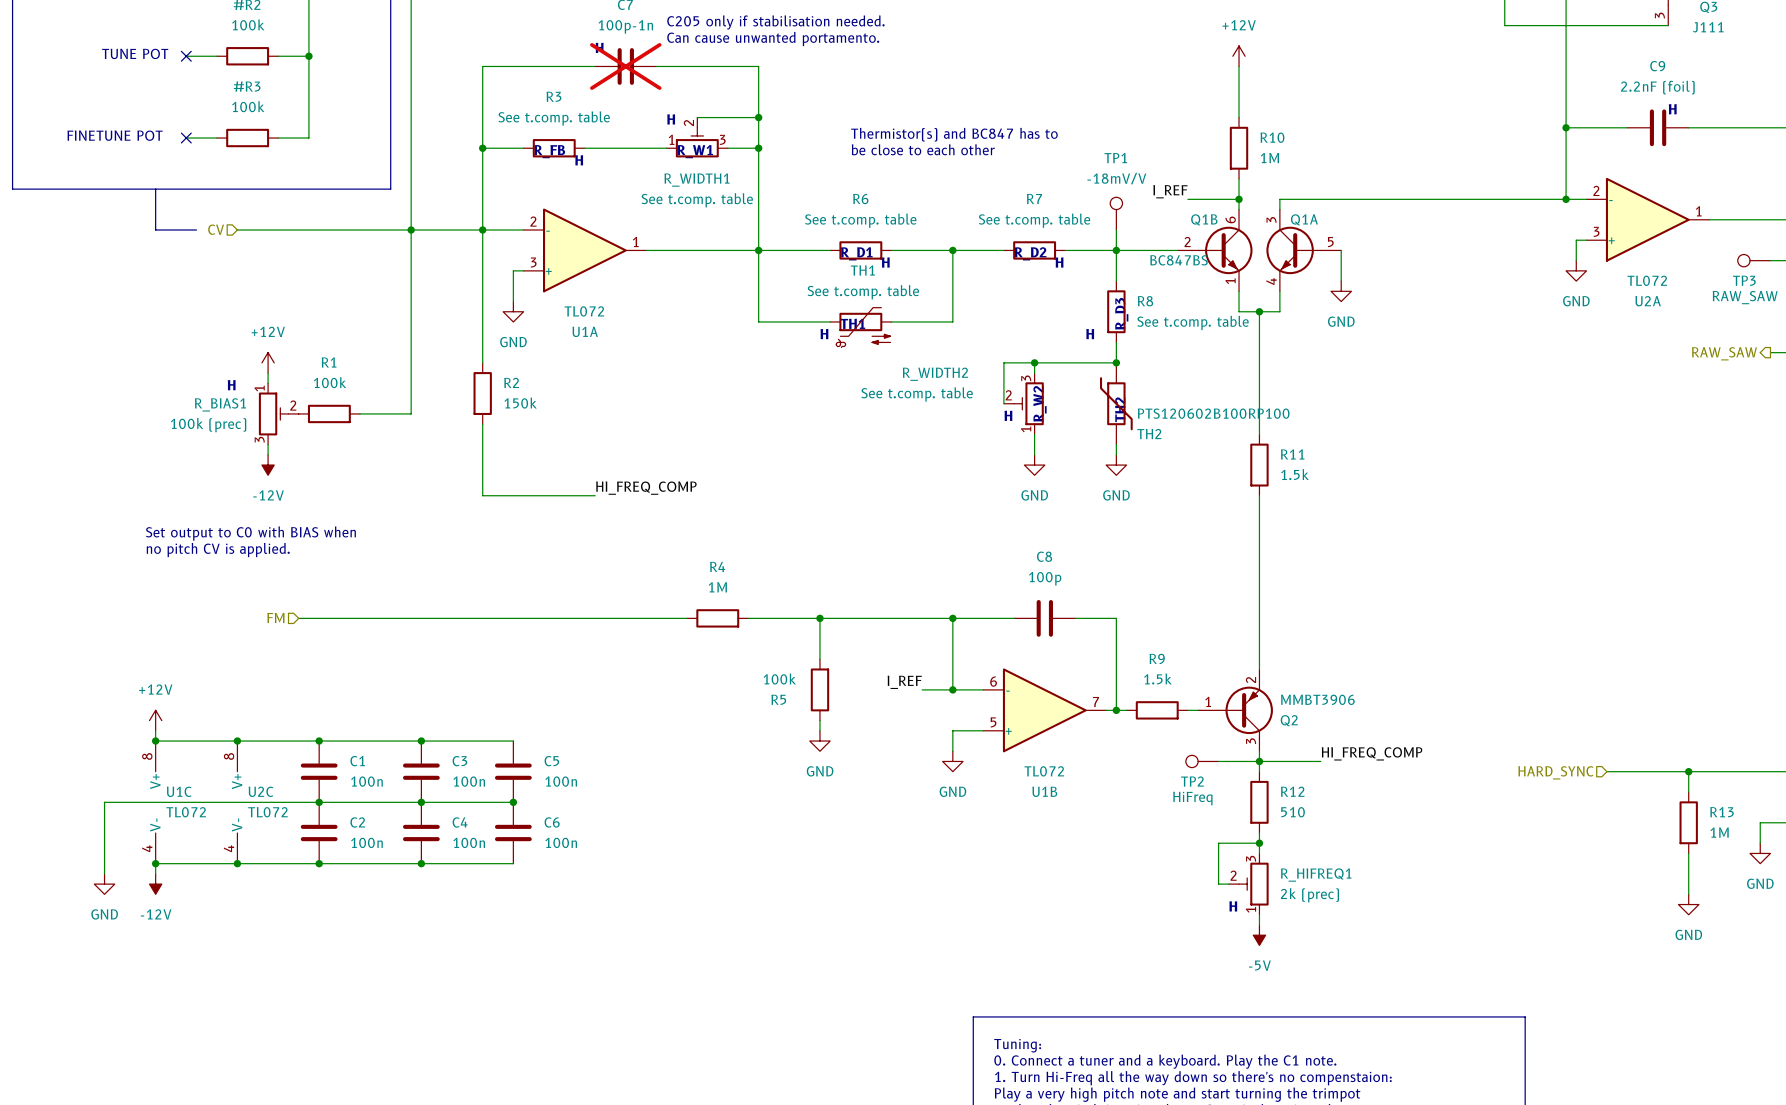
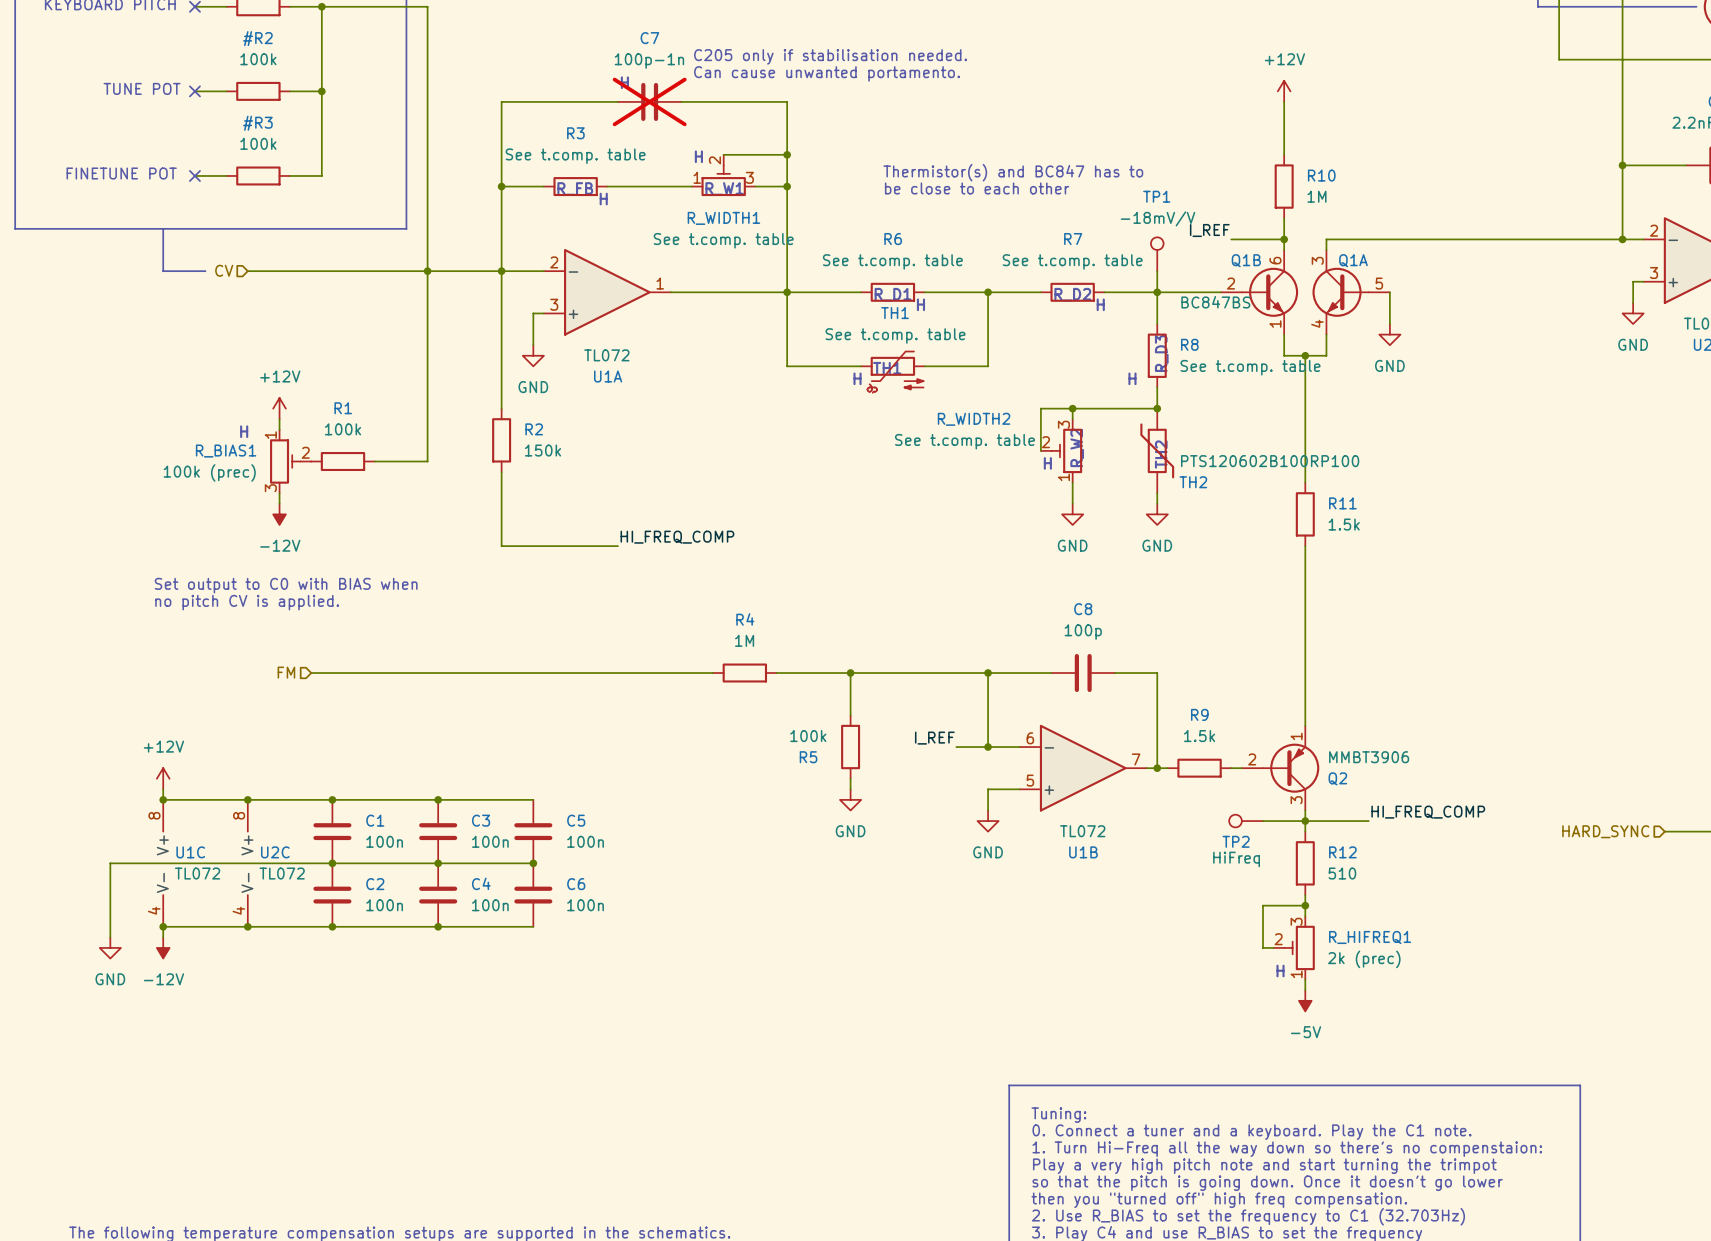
Q2 pin number: 2 (1251, 680) -> 1 (1296, 736)
Q2 pin number: 1 (1208, 701) -> 2 (1252, 759)

